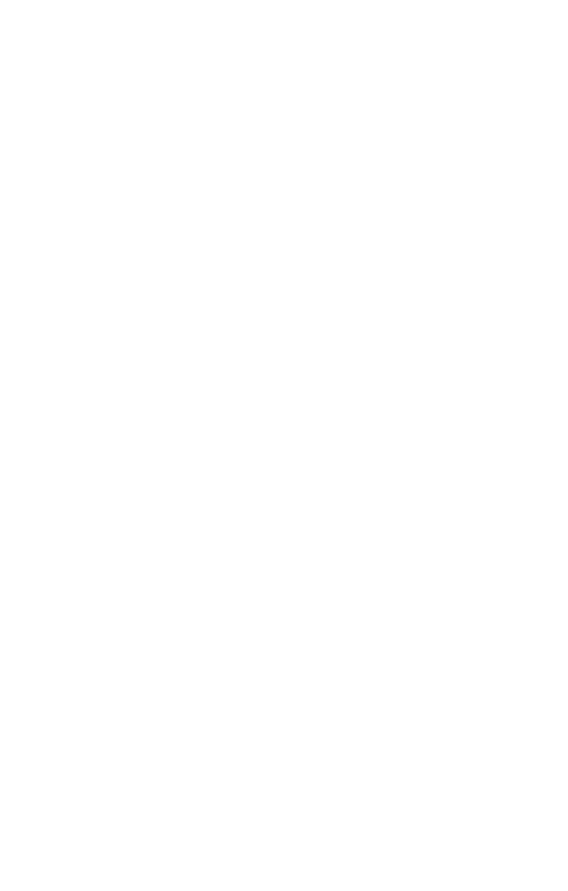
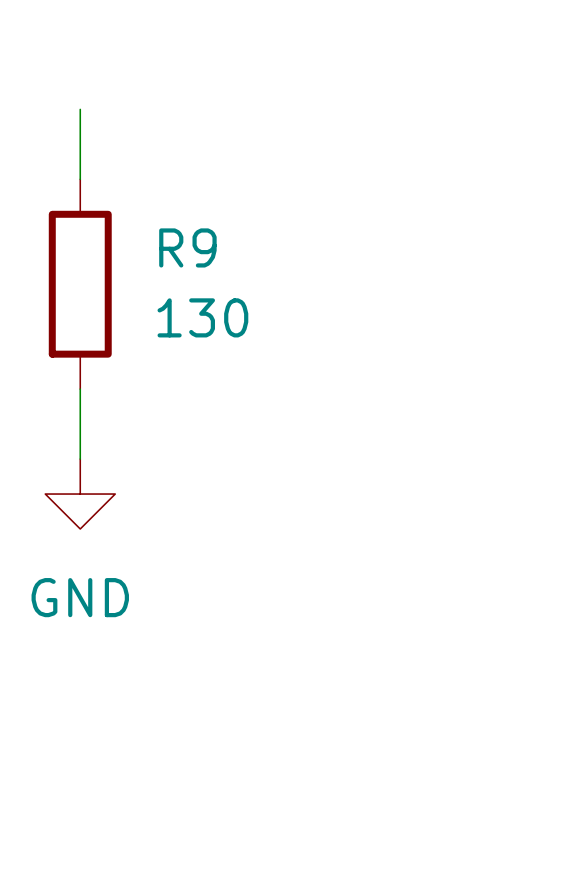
wire: none -> (80, 109) (80, 179)
R9: none -> 130 (80, 284)
wire: none -> (80, 389) (80, 459)
power symbol: none -> GND (80, 494)

